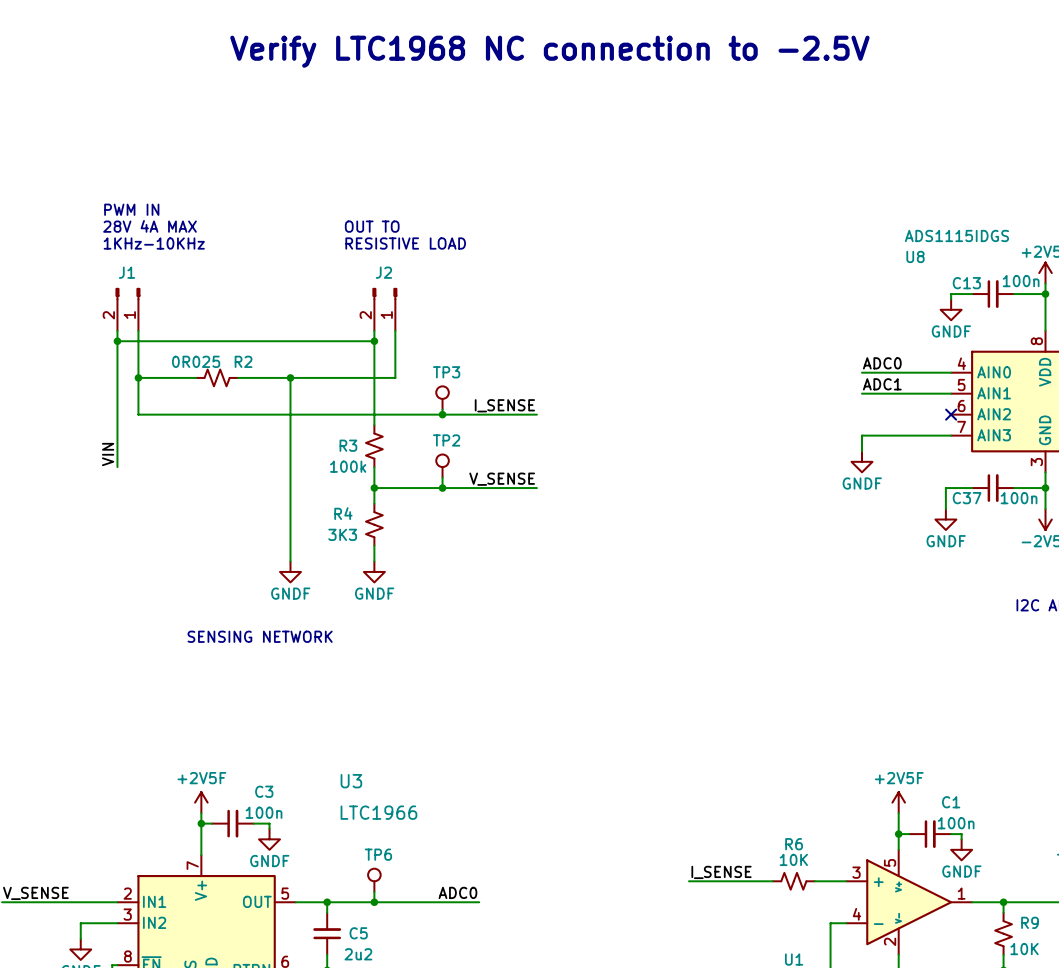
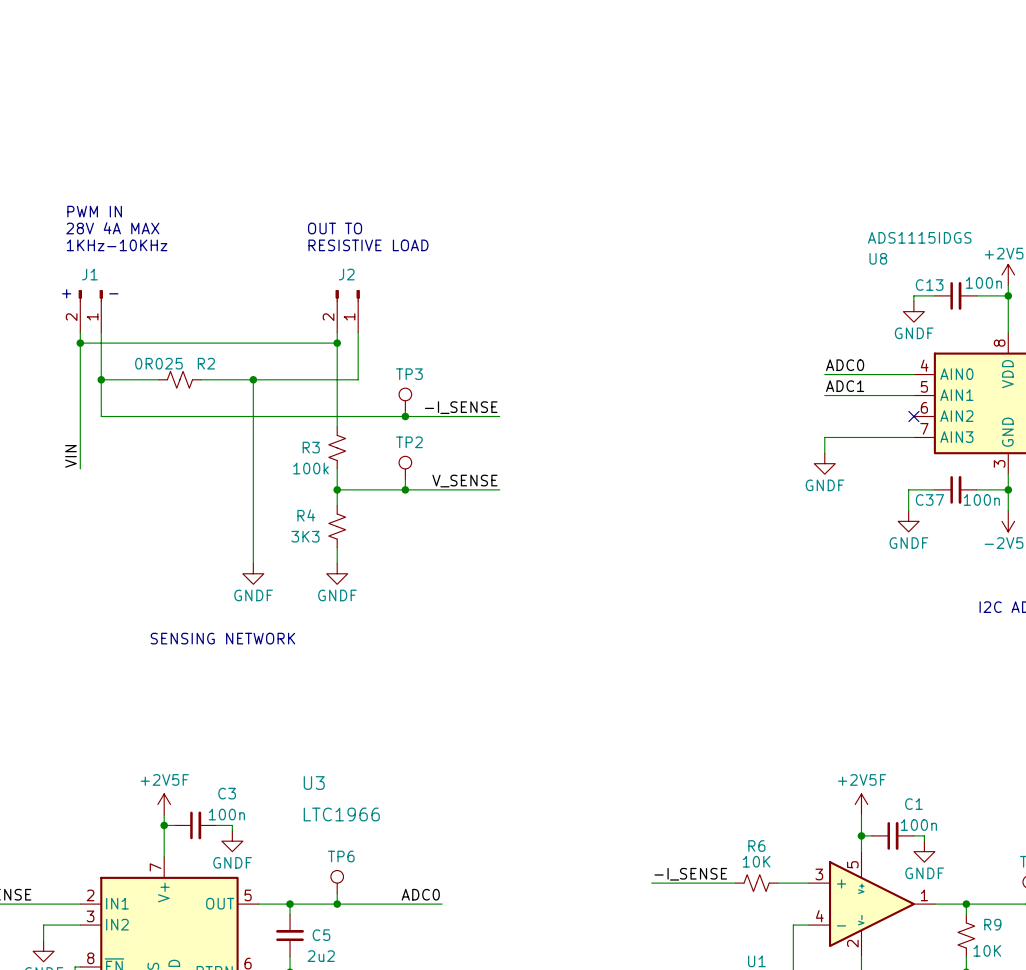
text: Verify LTC1968 NC connection to -2.5V (549, 51) -> none
text: none -> + (66, 293)
text: none -> - (113, 293)
label: I_SENSE (504, 405) -> -I_SENSE (461, 407)
label: I_SENSE (721, 872) -> -I_SENSE (690, 874)

